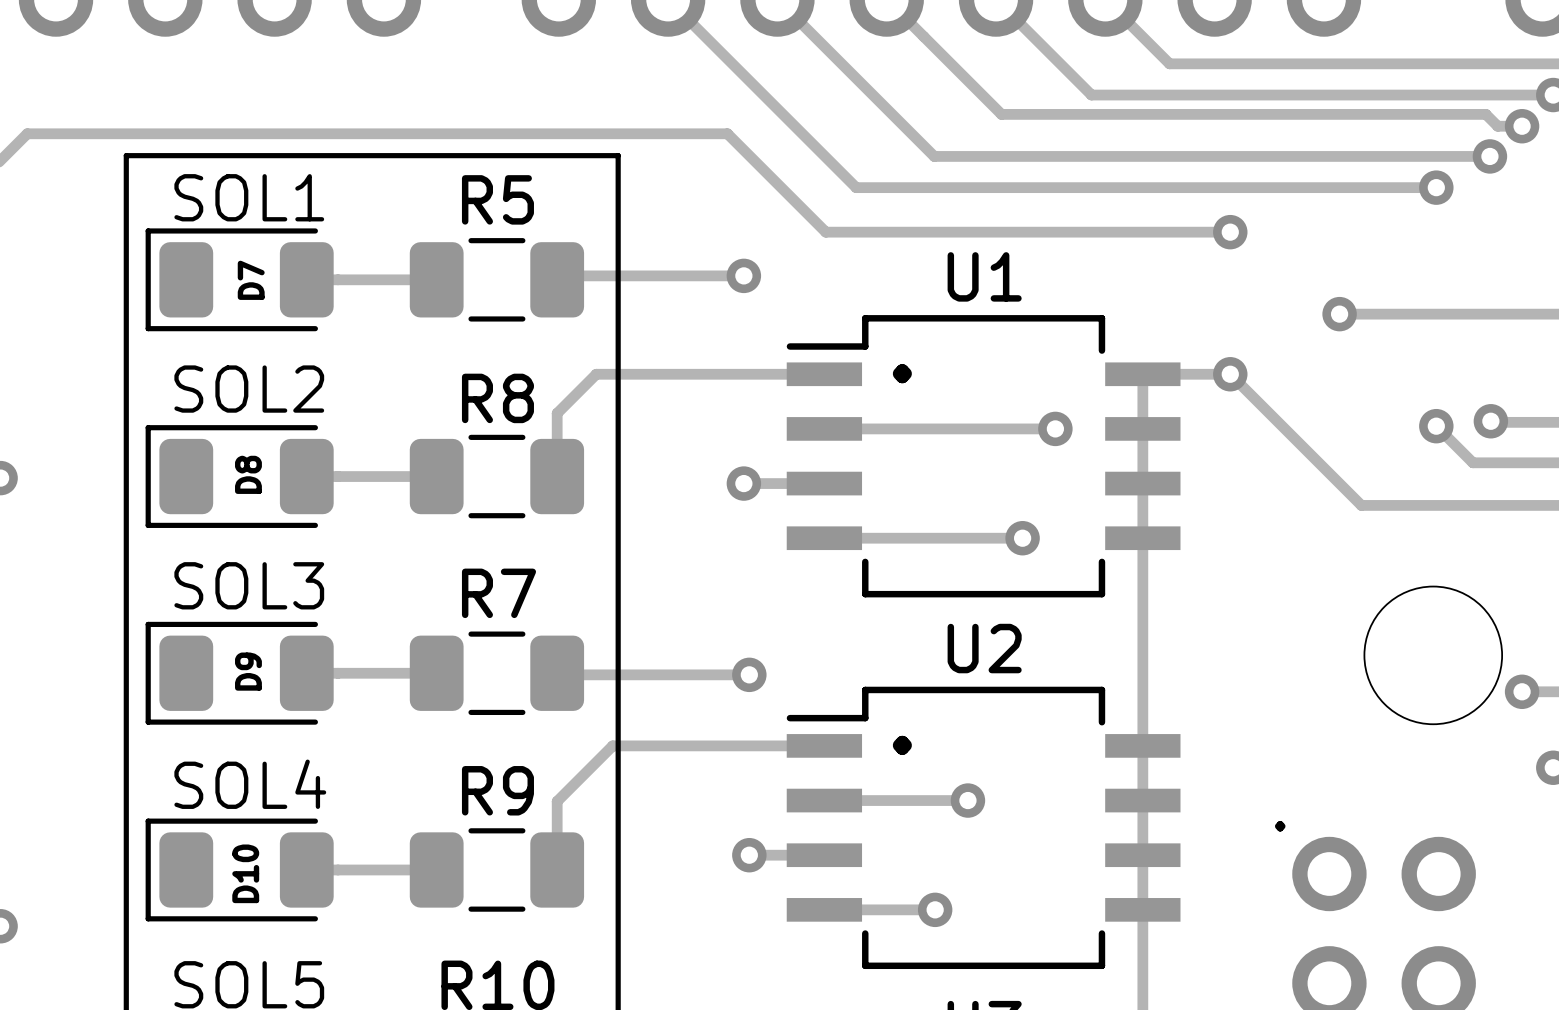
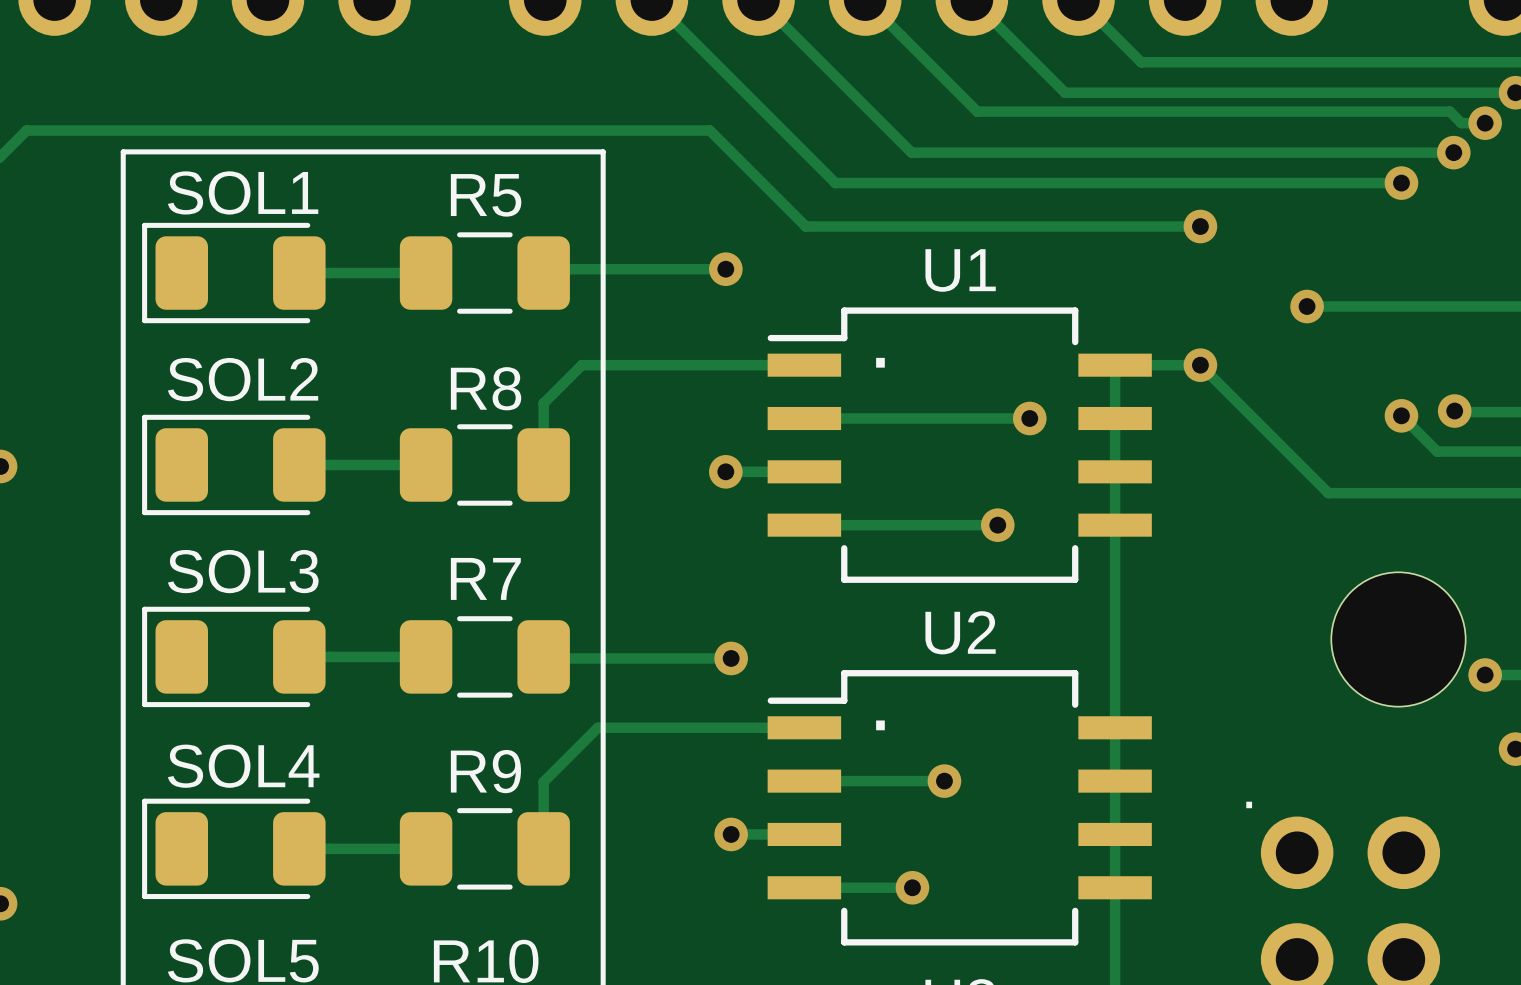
D7 name: D7 (251, 280) -> none
D8 name: D8 (248, 474) -> none
D9 name: D9 (248, 671) -> none
D10 name: D10 (245, 873) -> none

